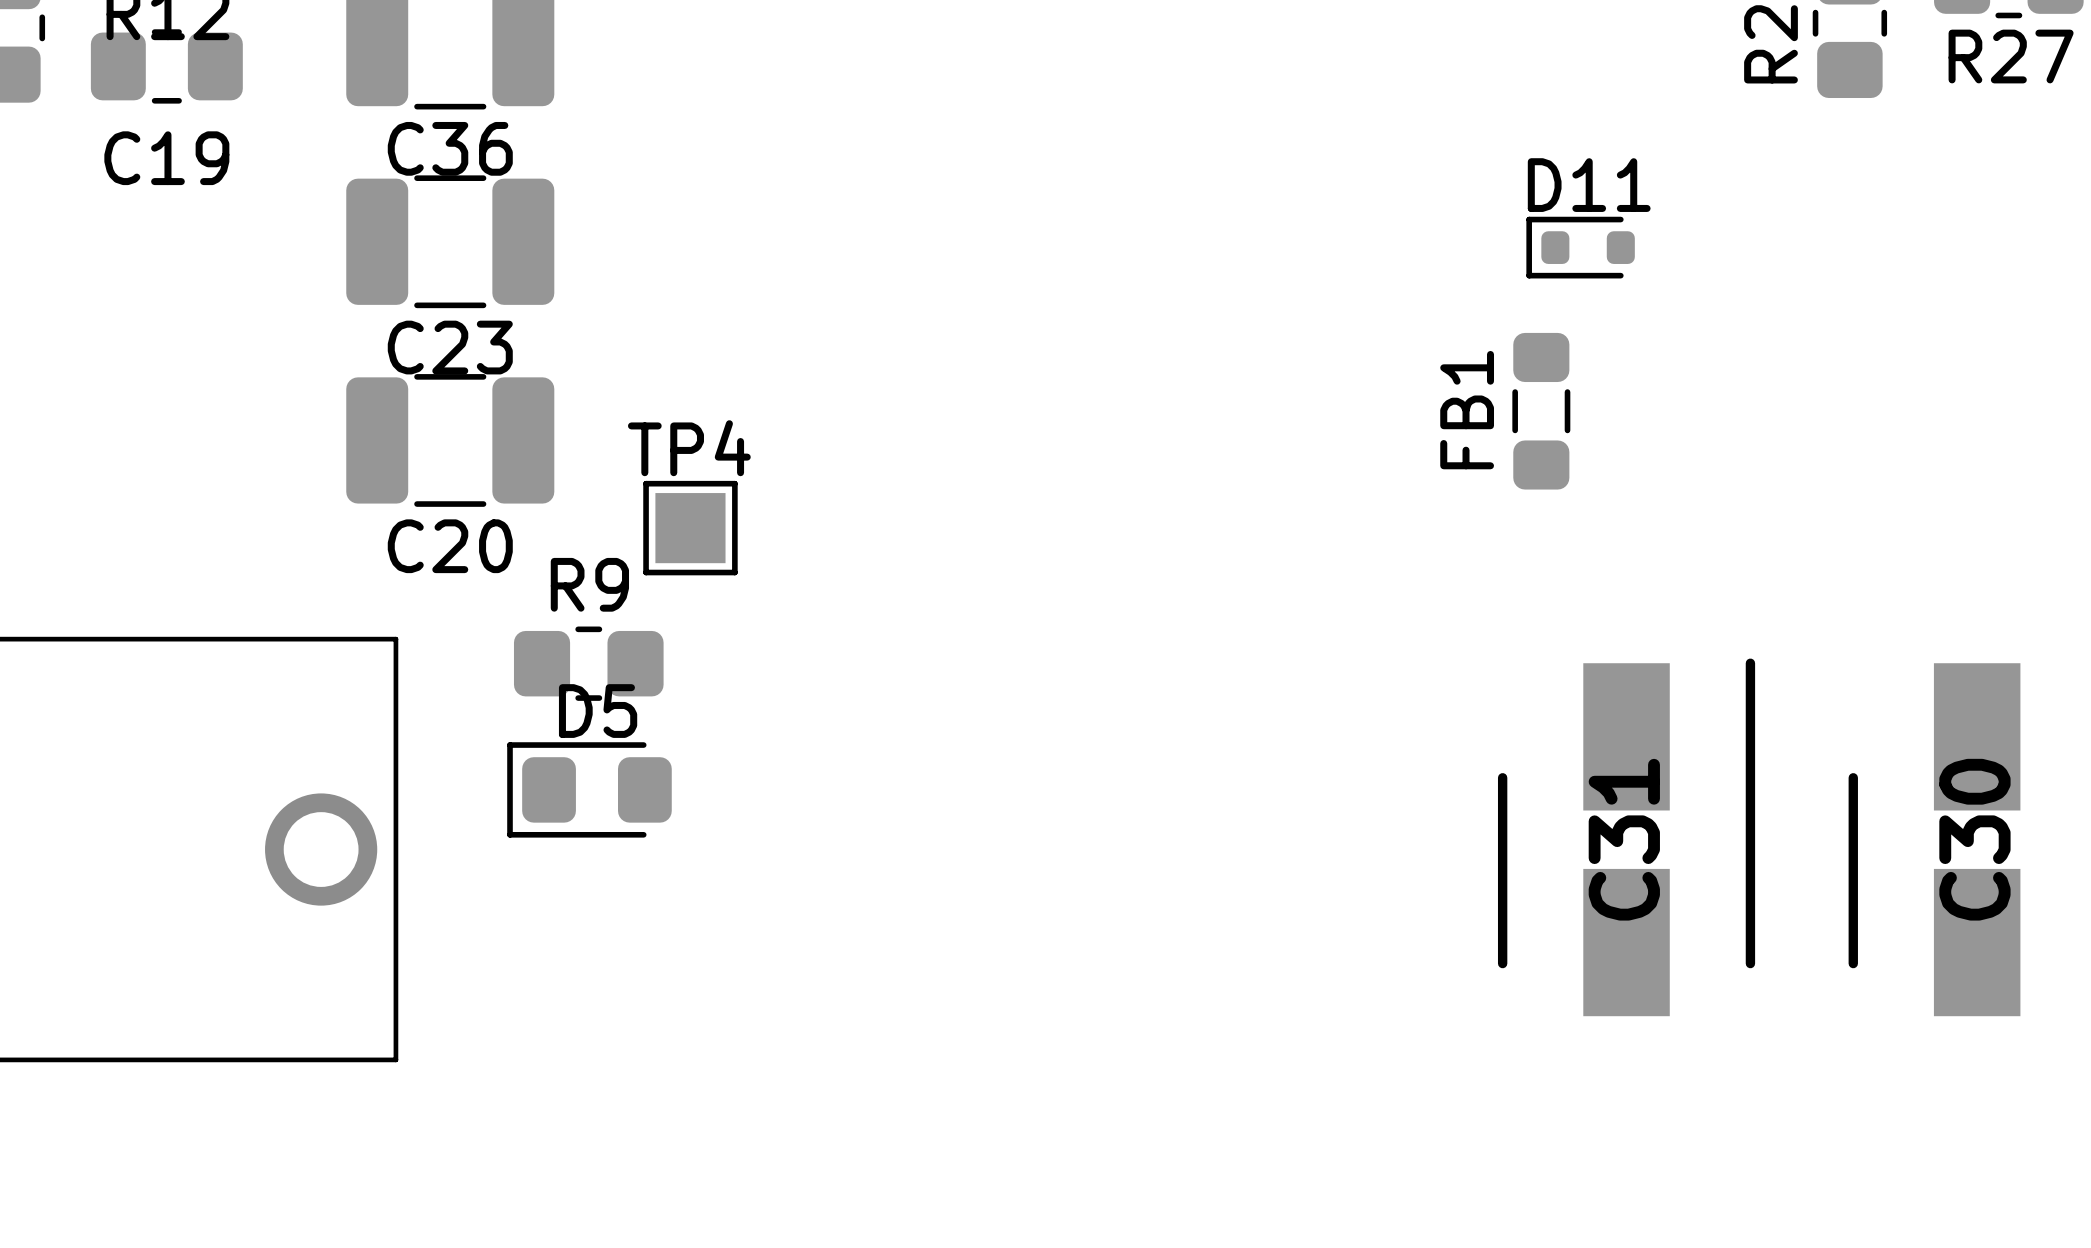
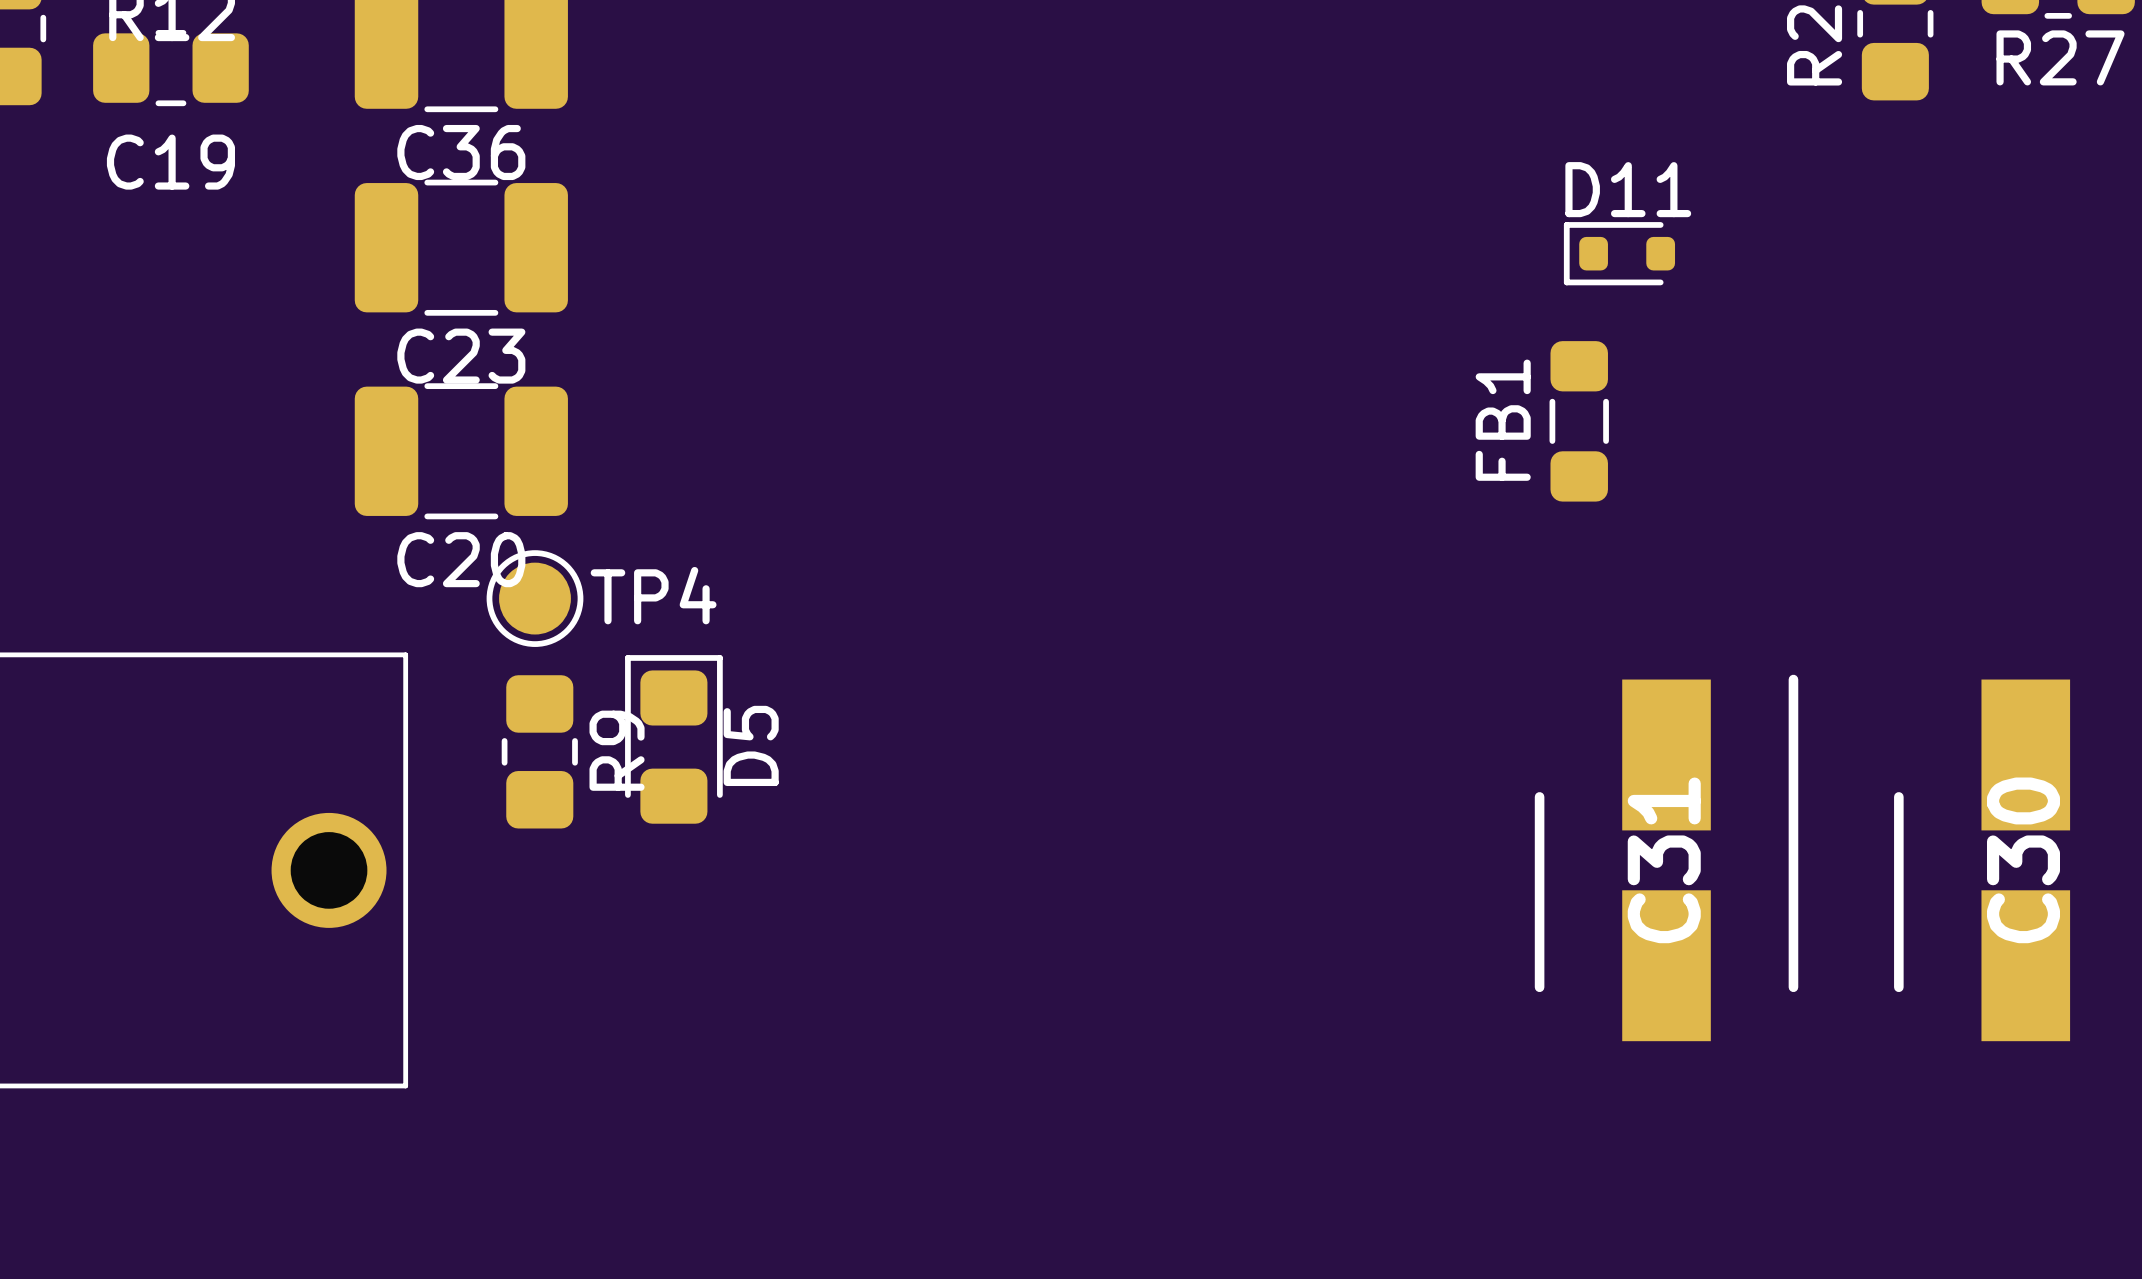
TP4 name position: TP4 (689, 448) -> TP4 (653, 595)
TP4 footprint: [643, 480, 738, 576] -> [486, 550, 584, 647]
R9 rotation: 0° (588, 663) -> 90° clockwise (539, 751)
R9 position: (588, 663) -> (539, 751)
D5 rotation: 0° (589, 789) -> 90° clockwise (673, 739)

